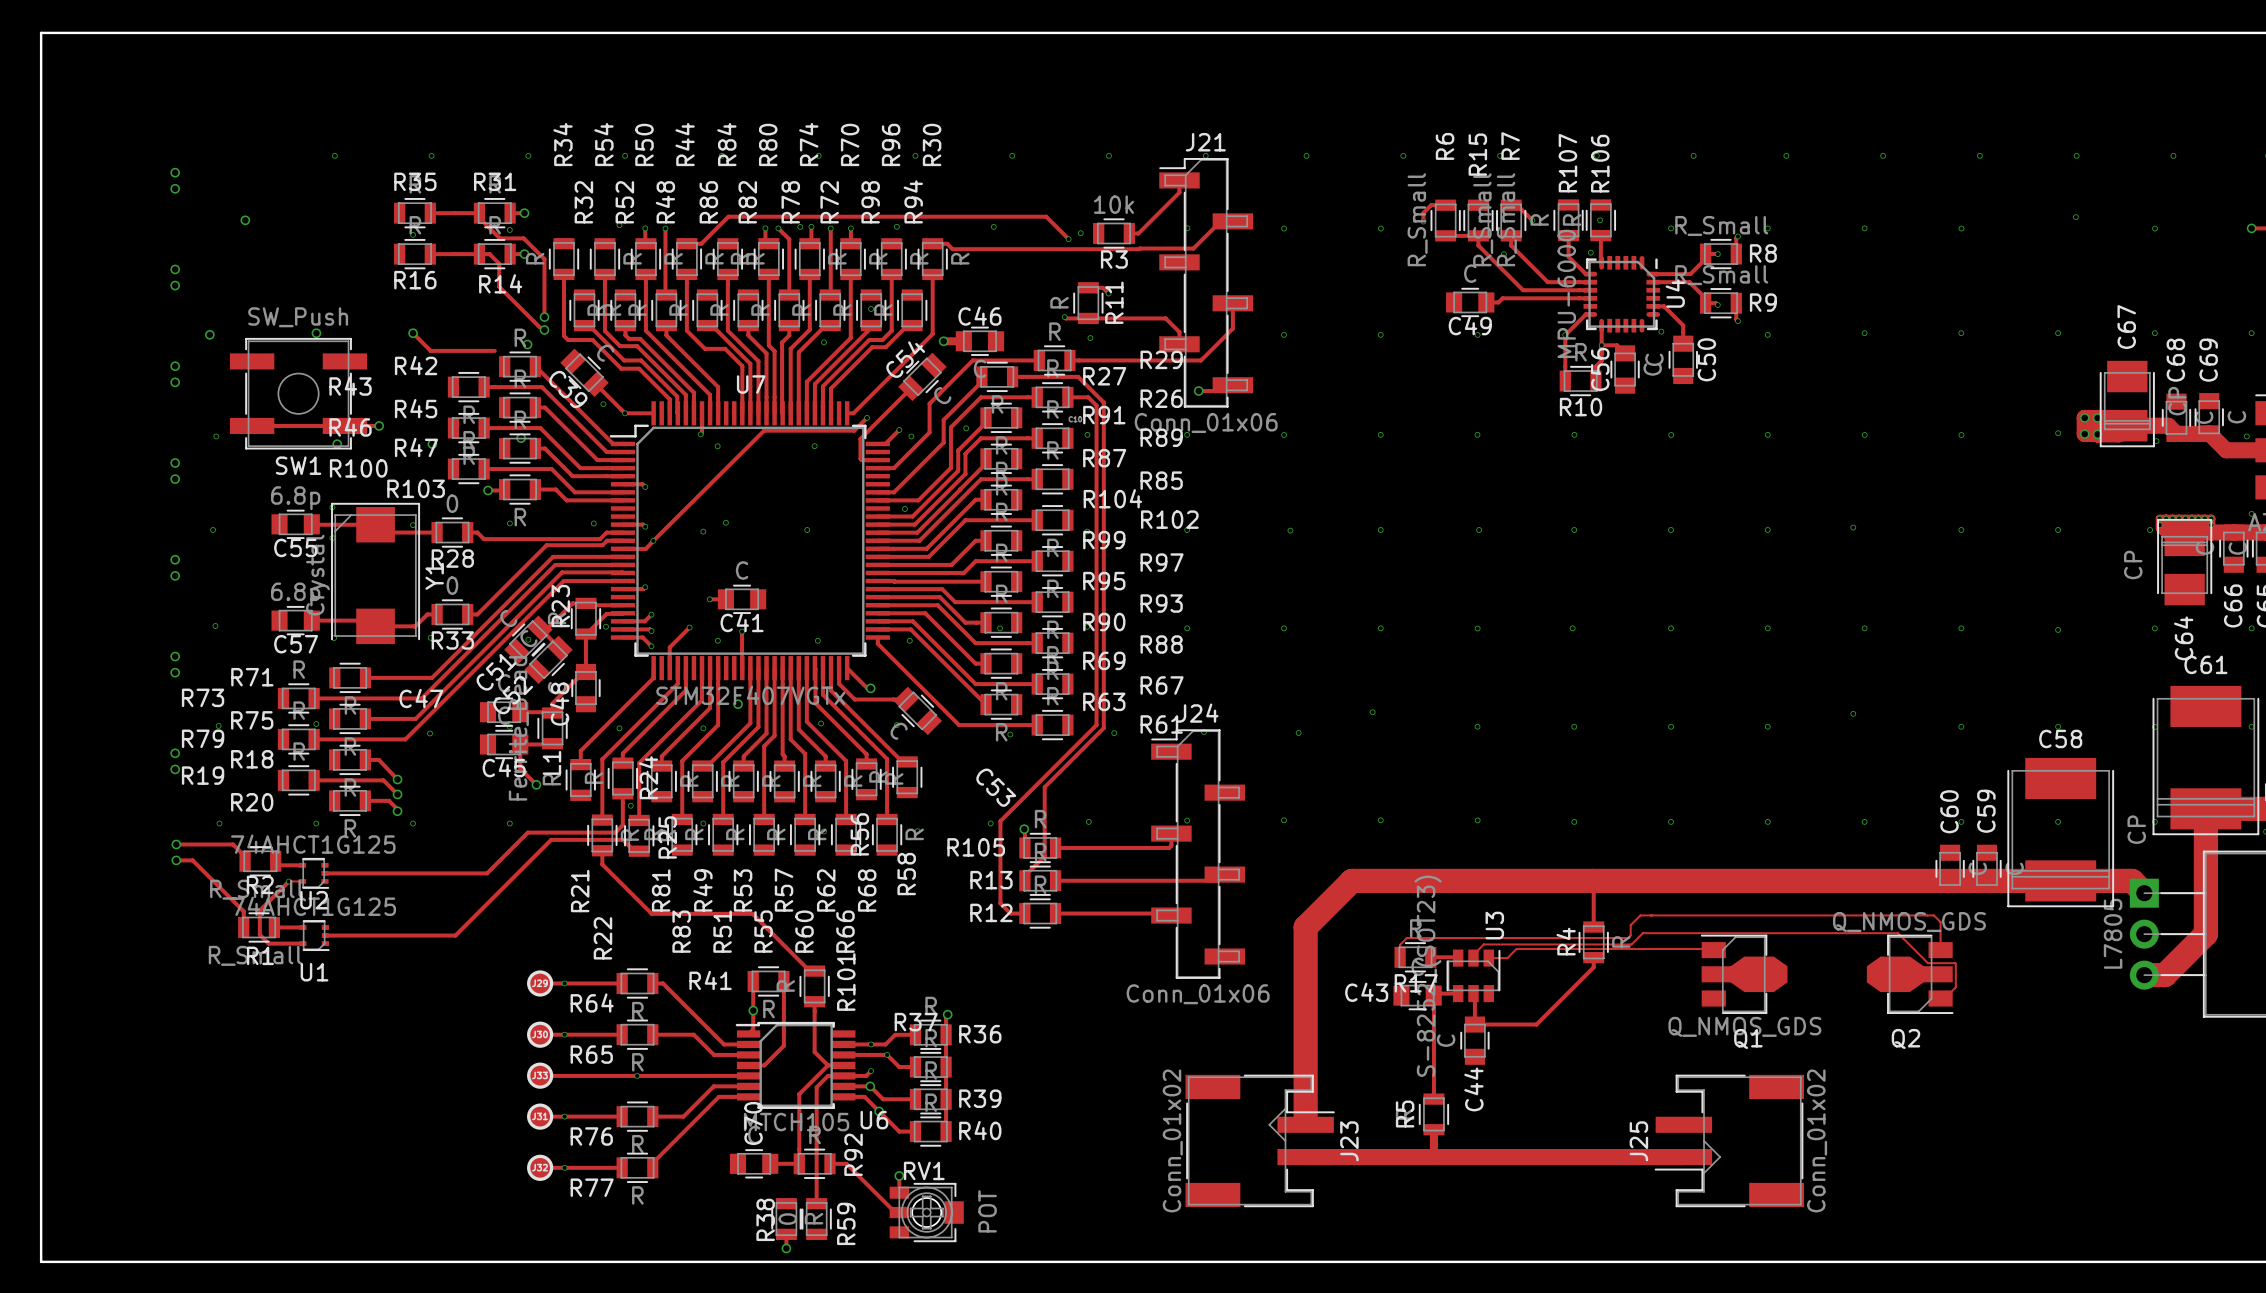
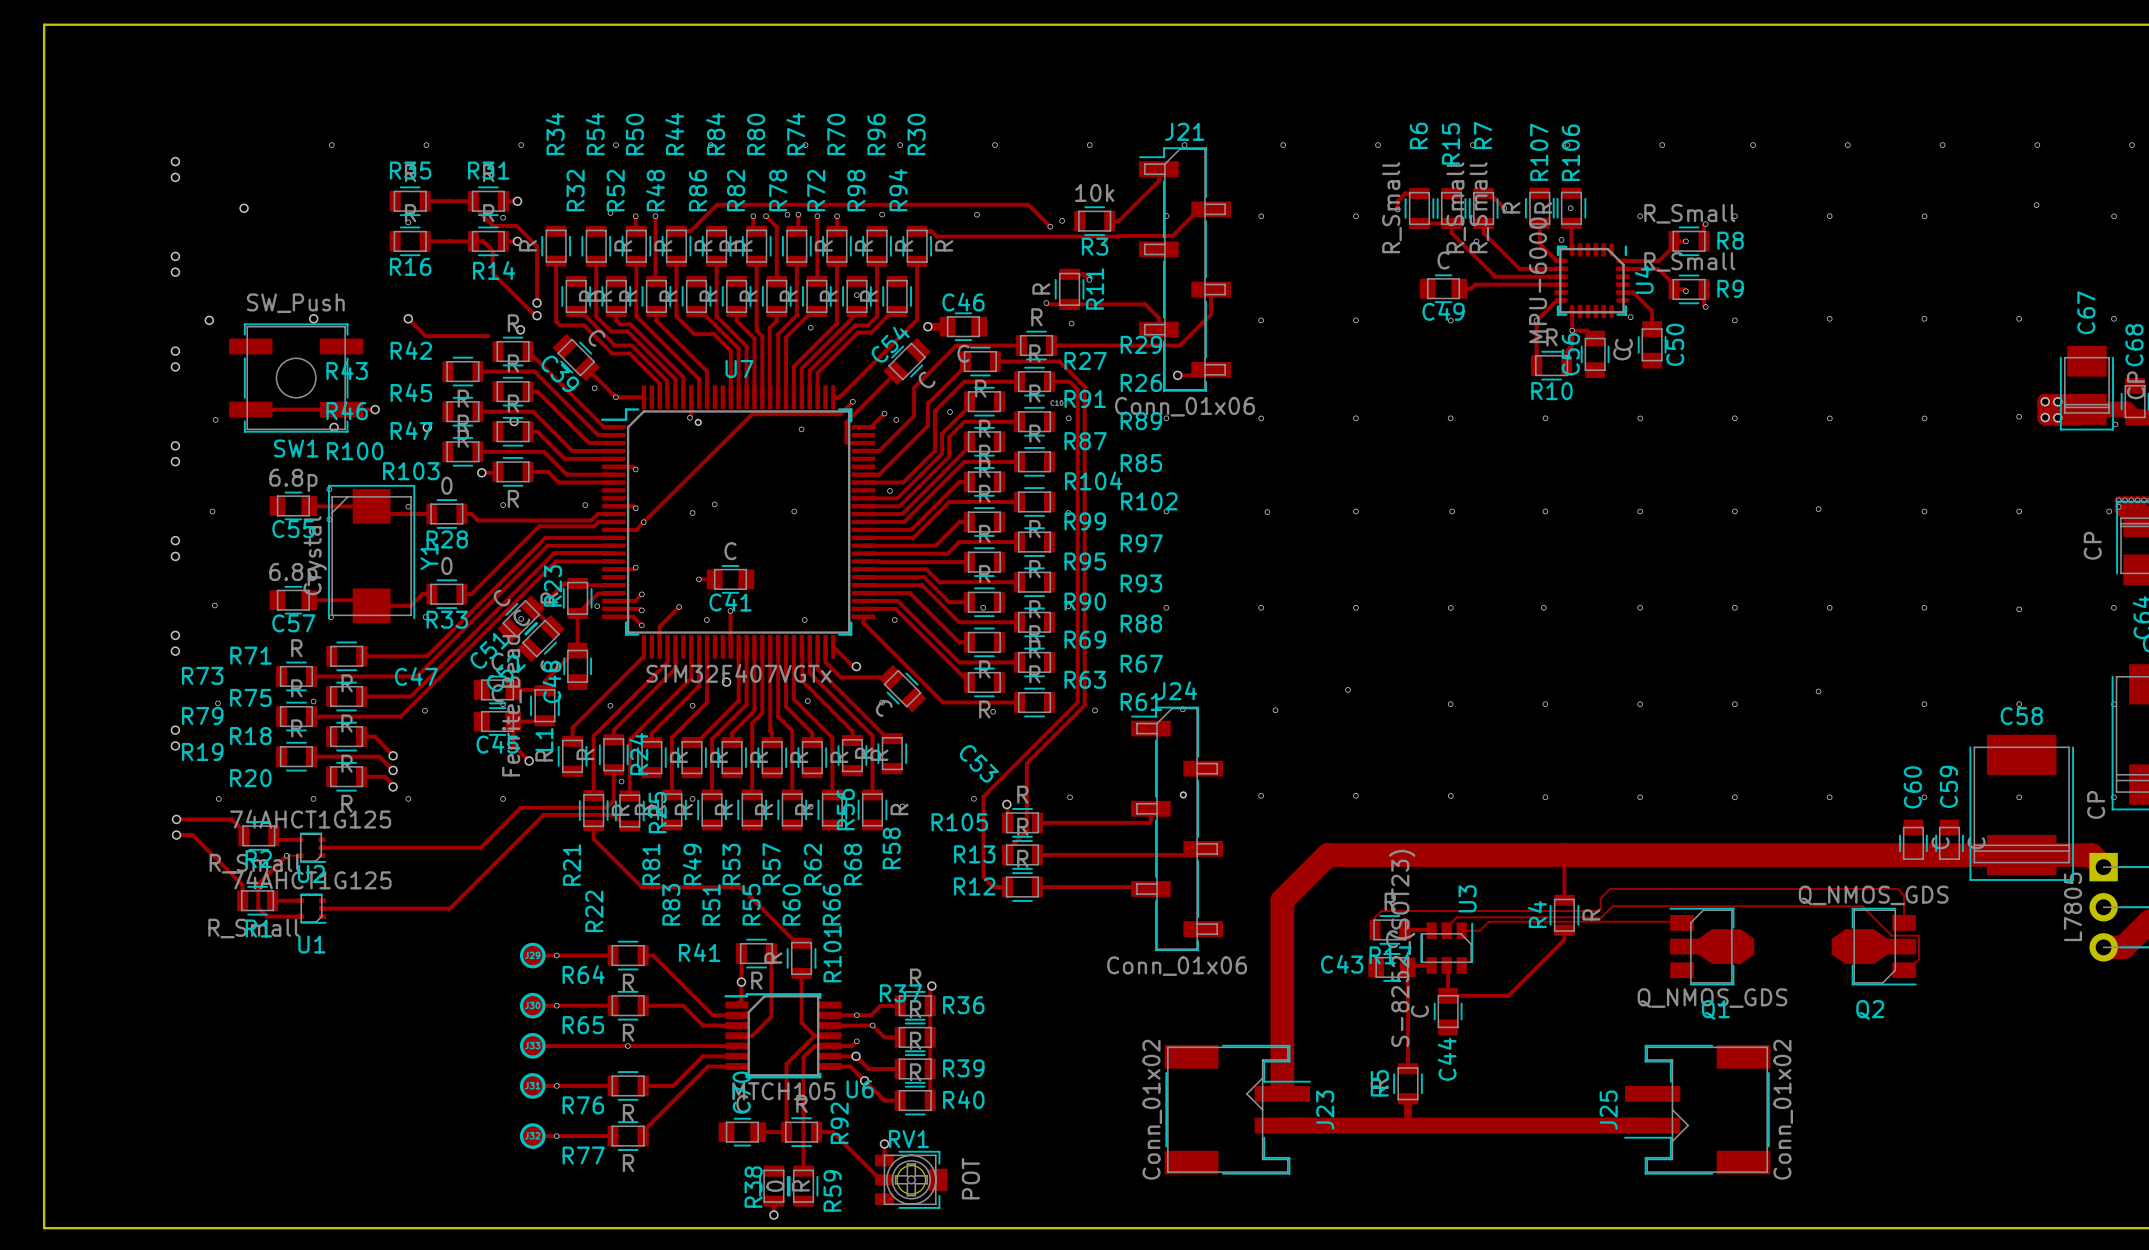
via: none -> (698, 422)
via: (717, 446) -> none
via: none -> (1183, 794)
via: (1187, 820) -> none

